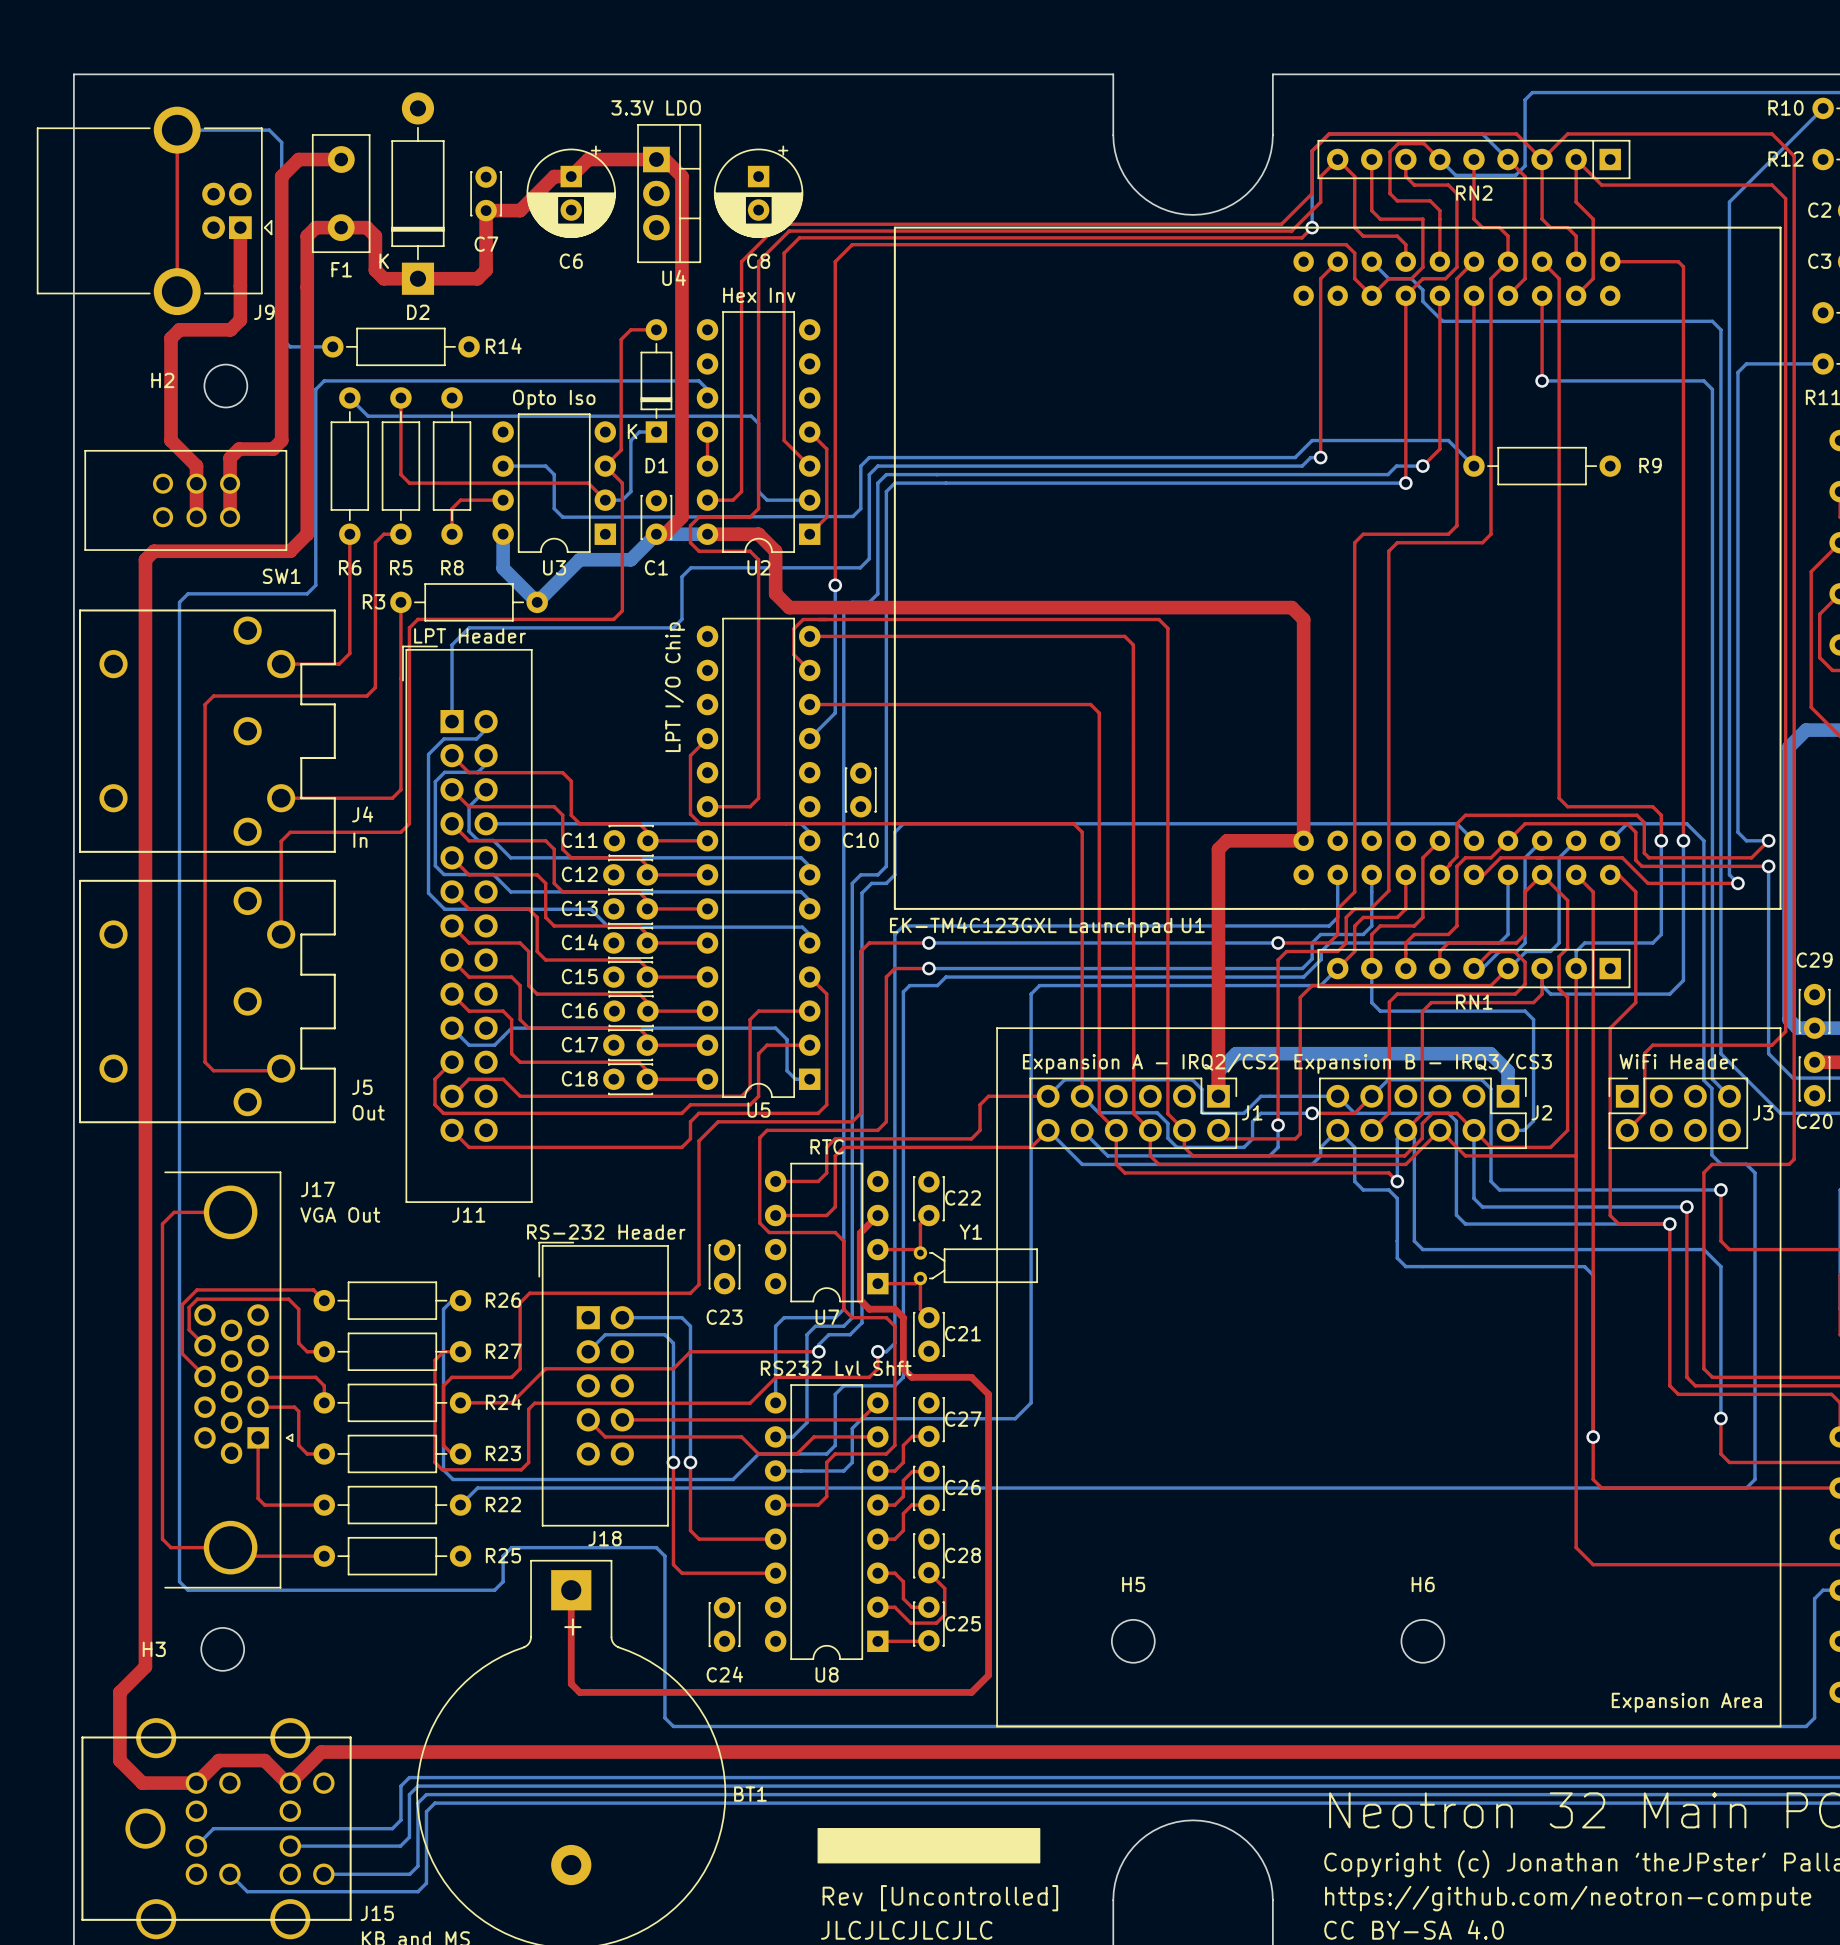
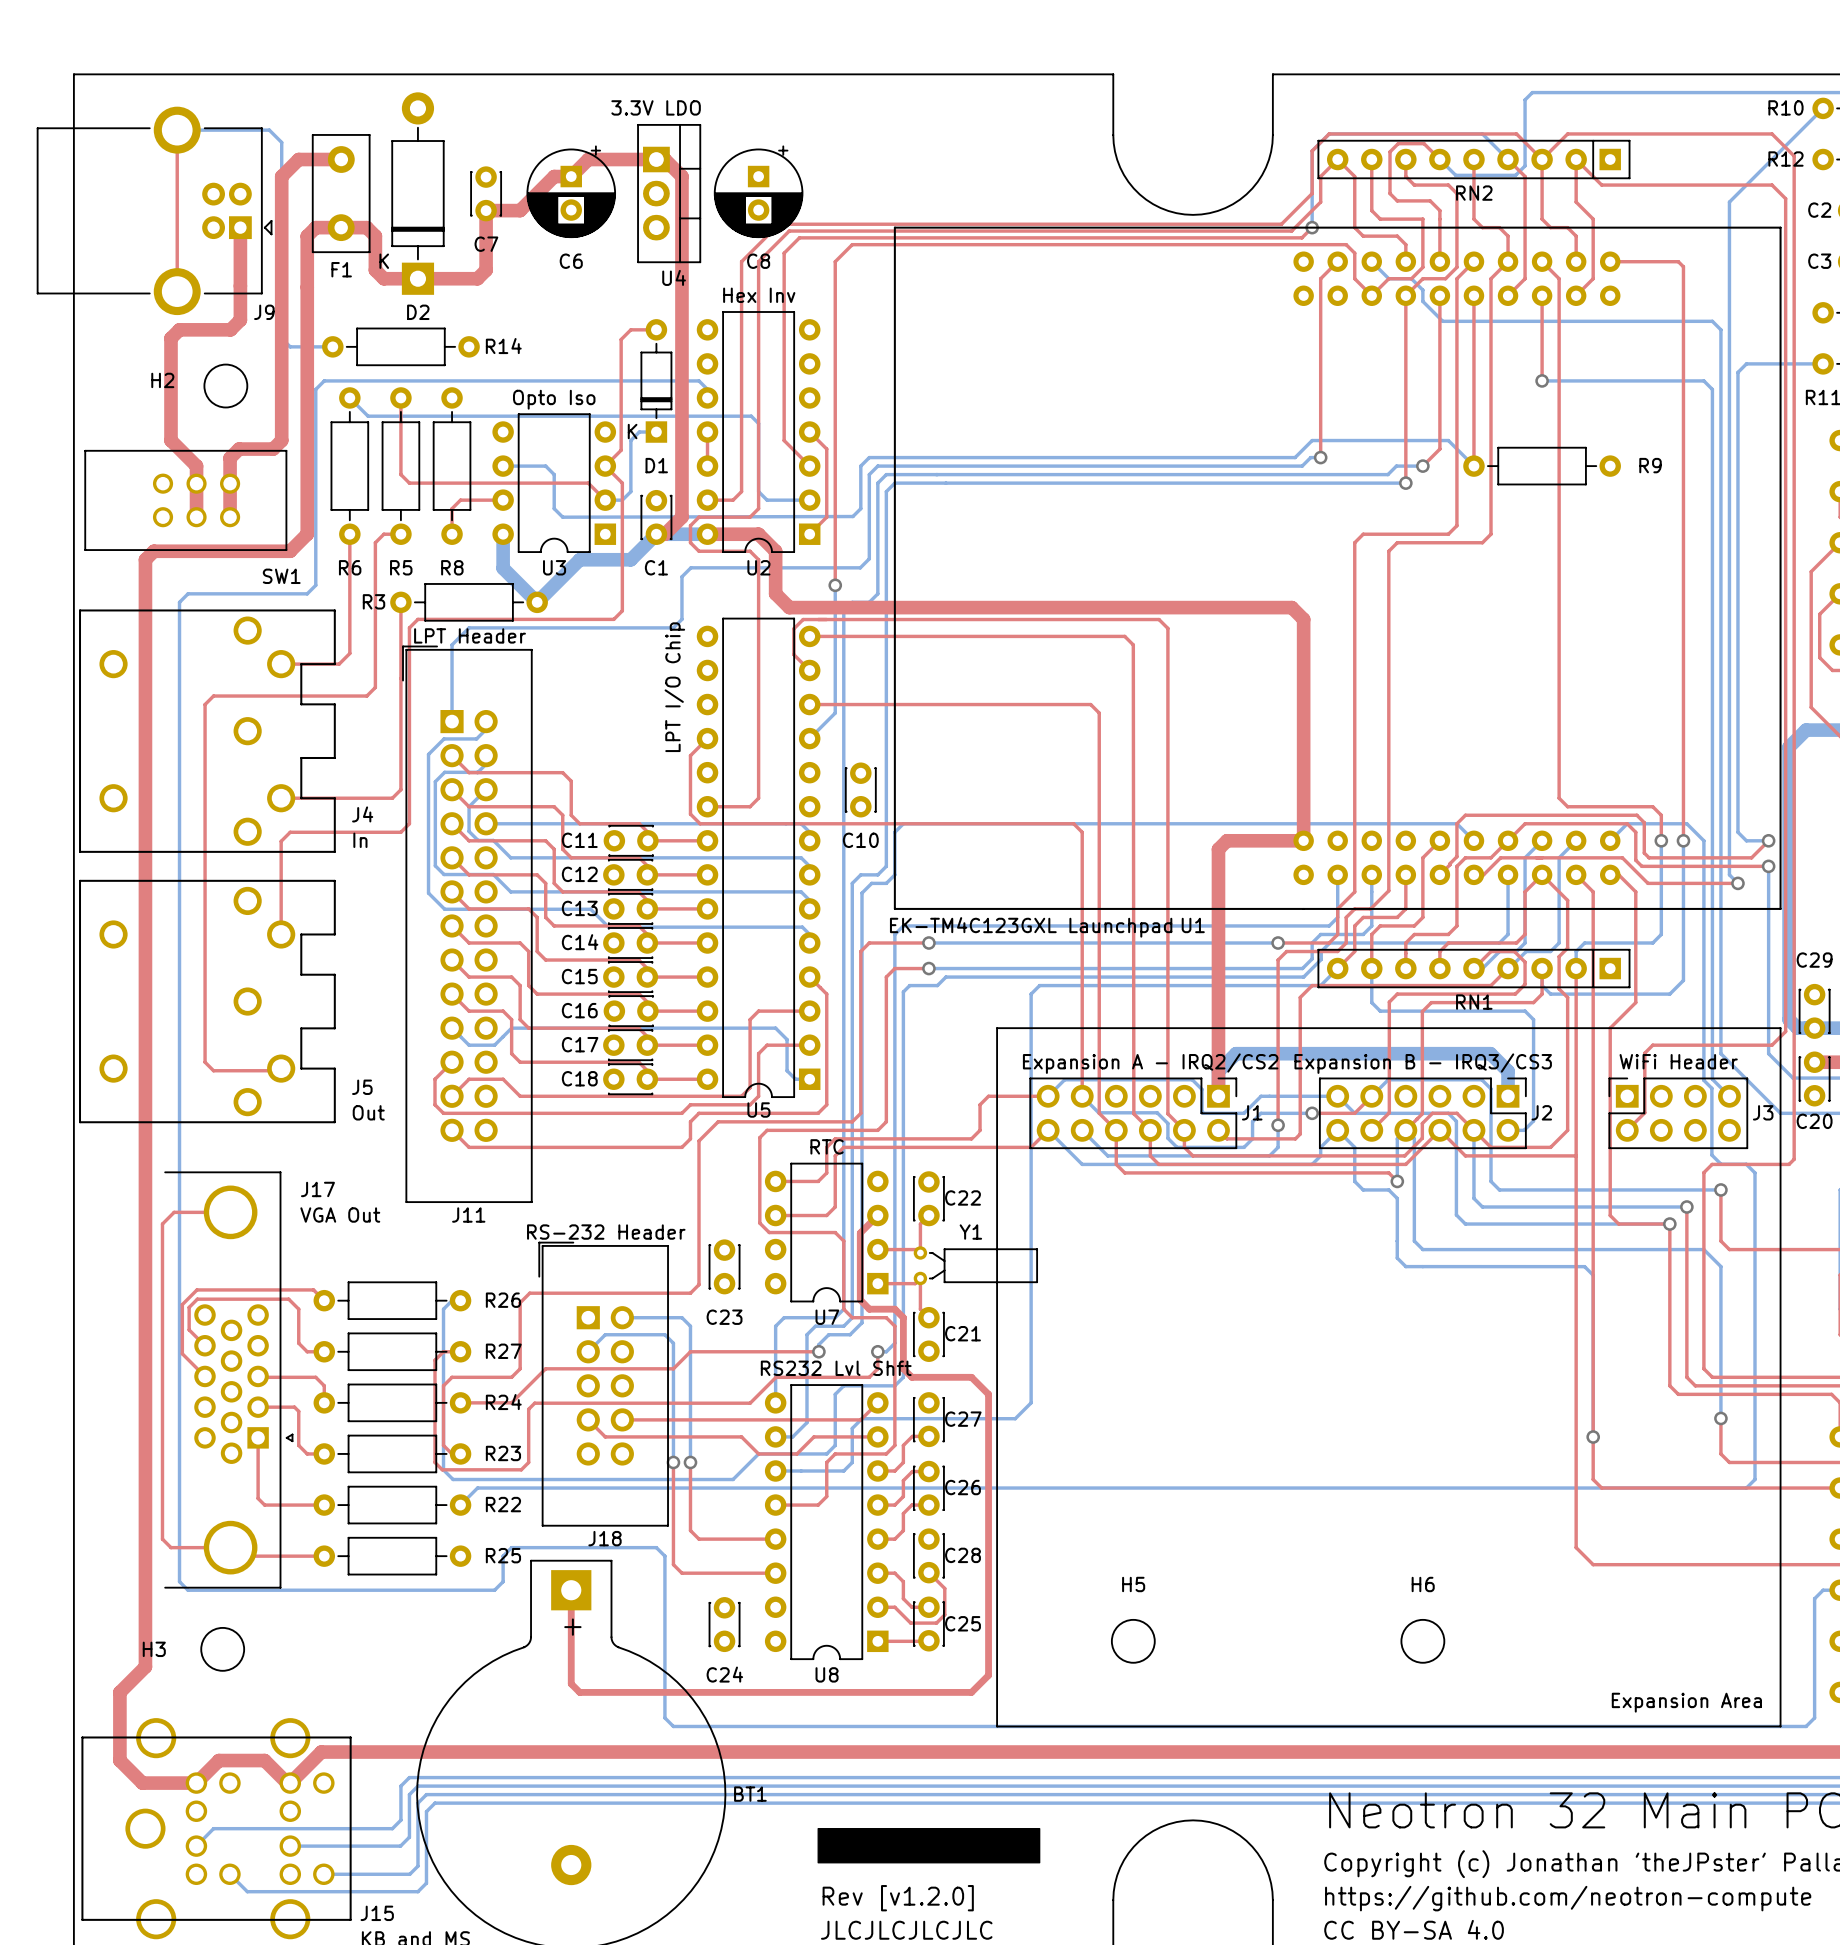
text: Rev [Uncontrolled] (940, 1898) -> Rev [v1.2.0] (898, 1898)

